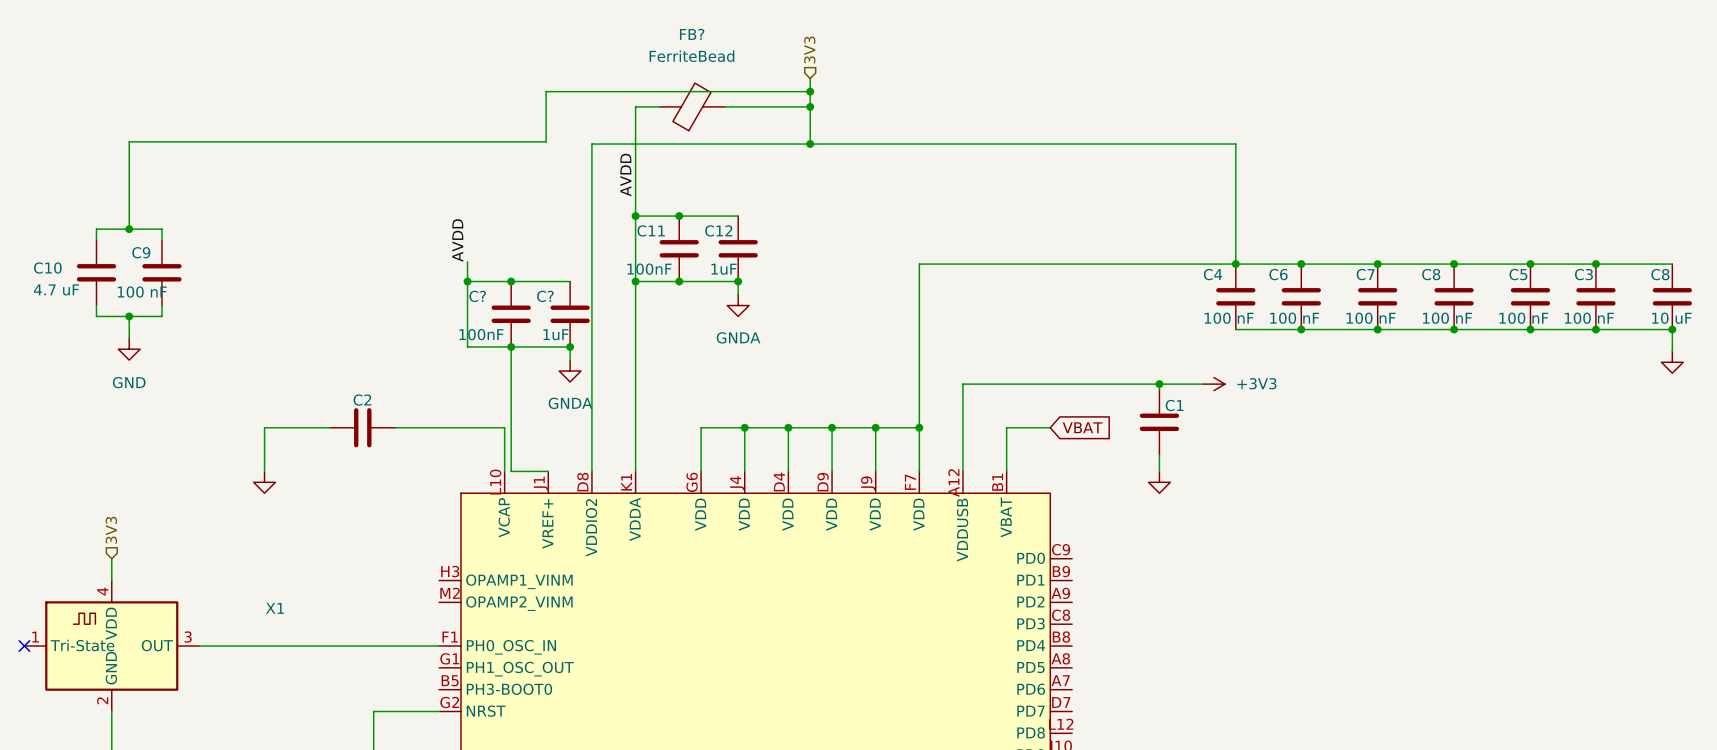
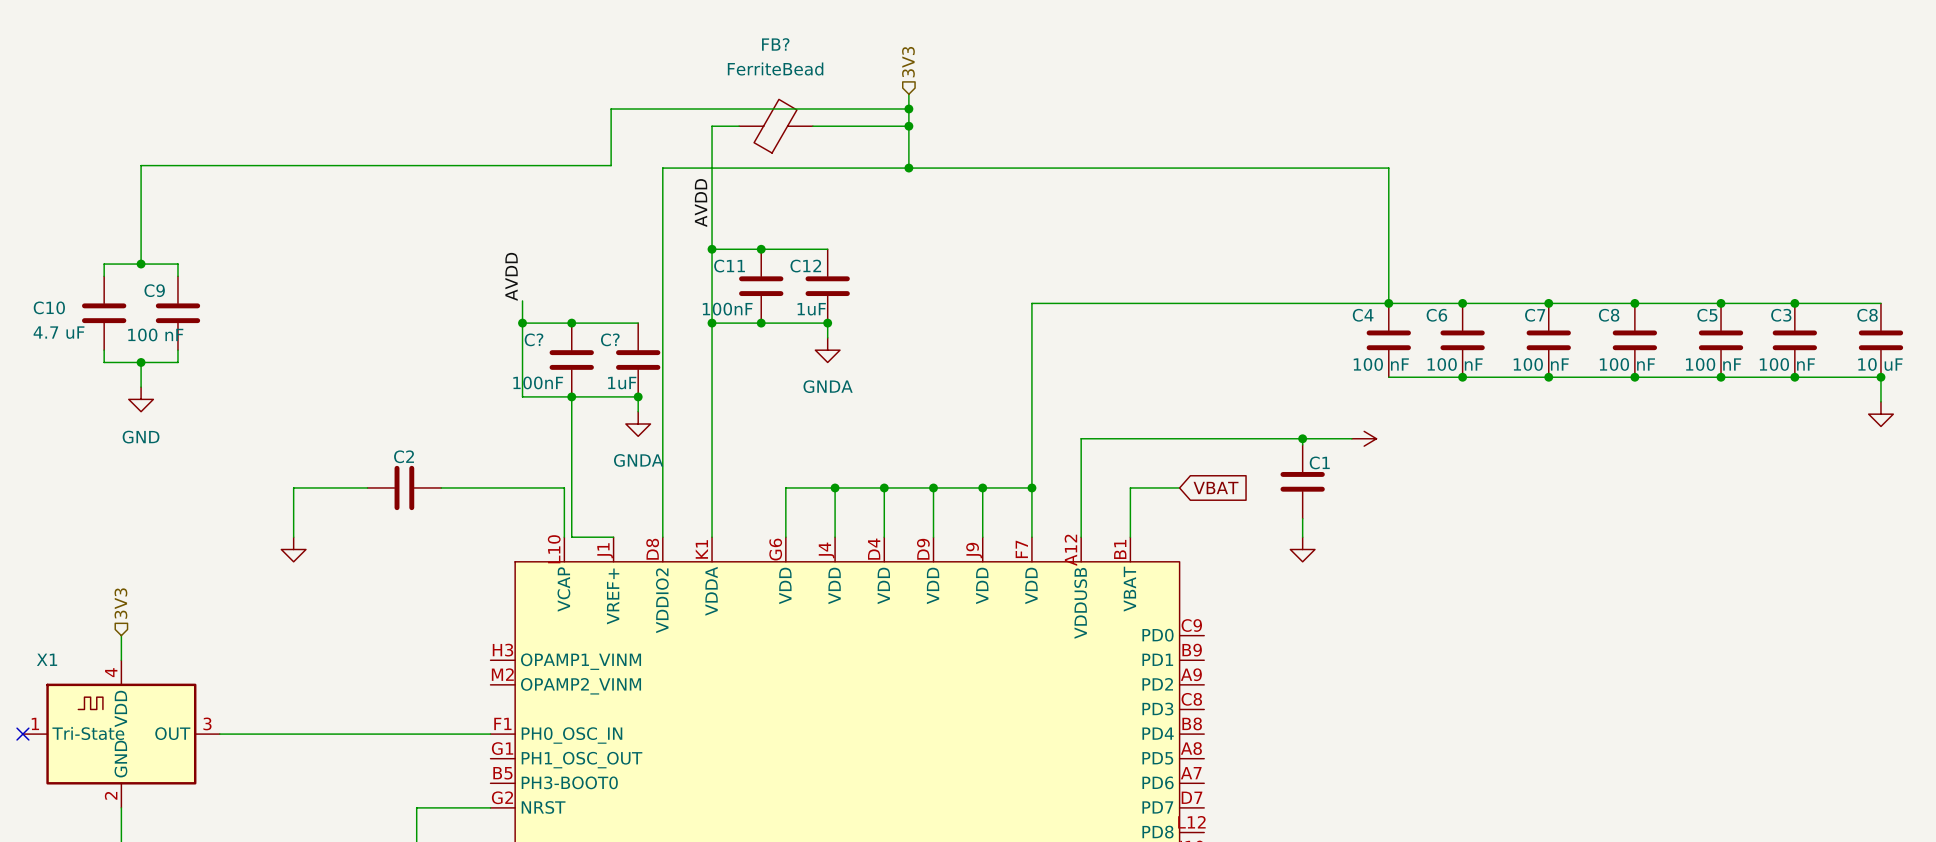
power symbol text: +3V3 (1256, 383) -> none
X1 name position: X1 (275, 608) -> X1 (47, 659)

